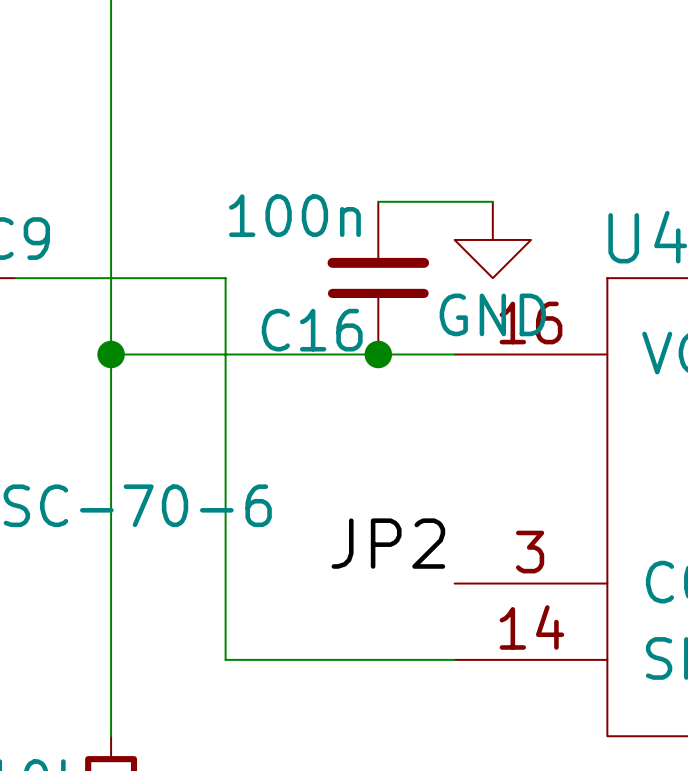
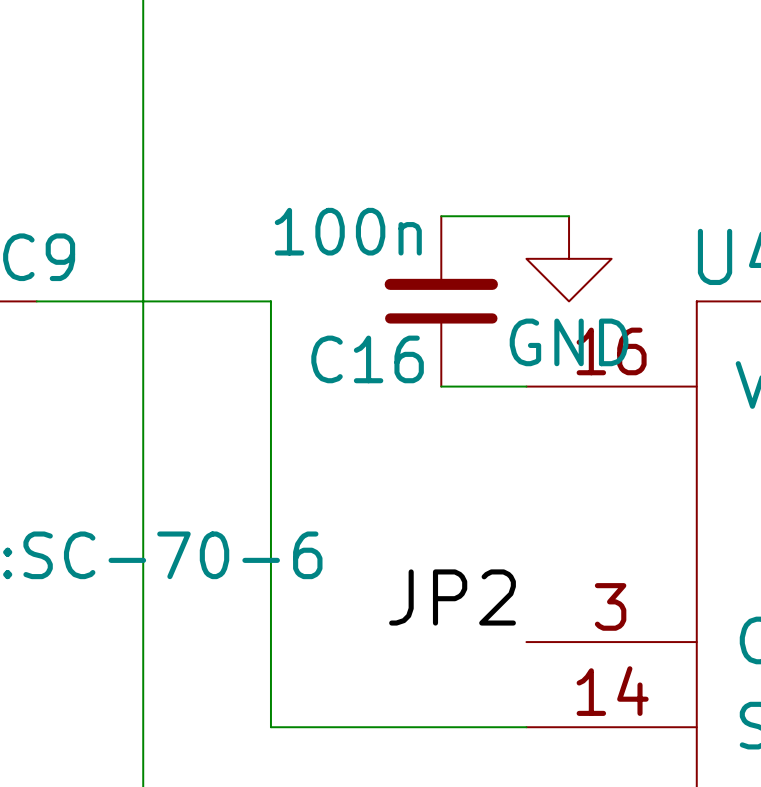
wire: (111, 354) (378, 354) -> none
junction: (111, 354) -> none
junction: (378, 354) -> none

